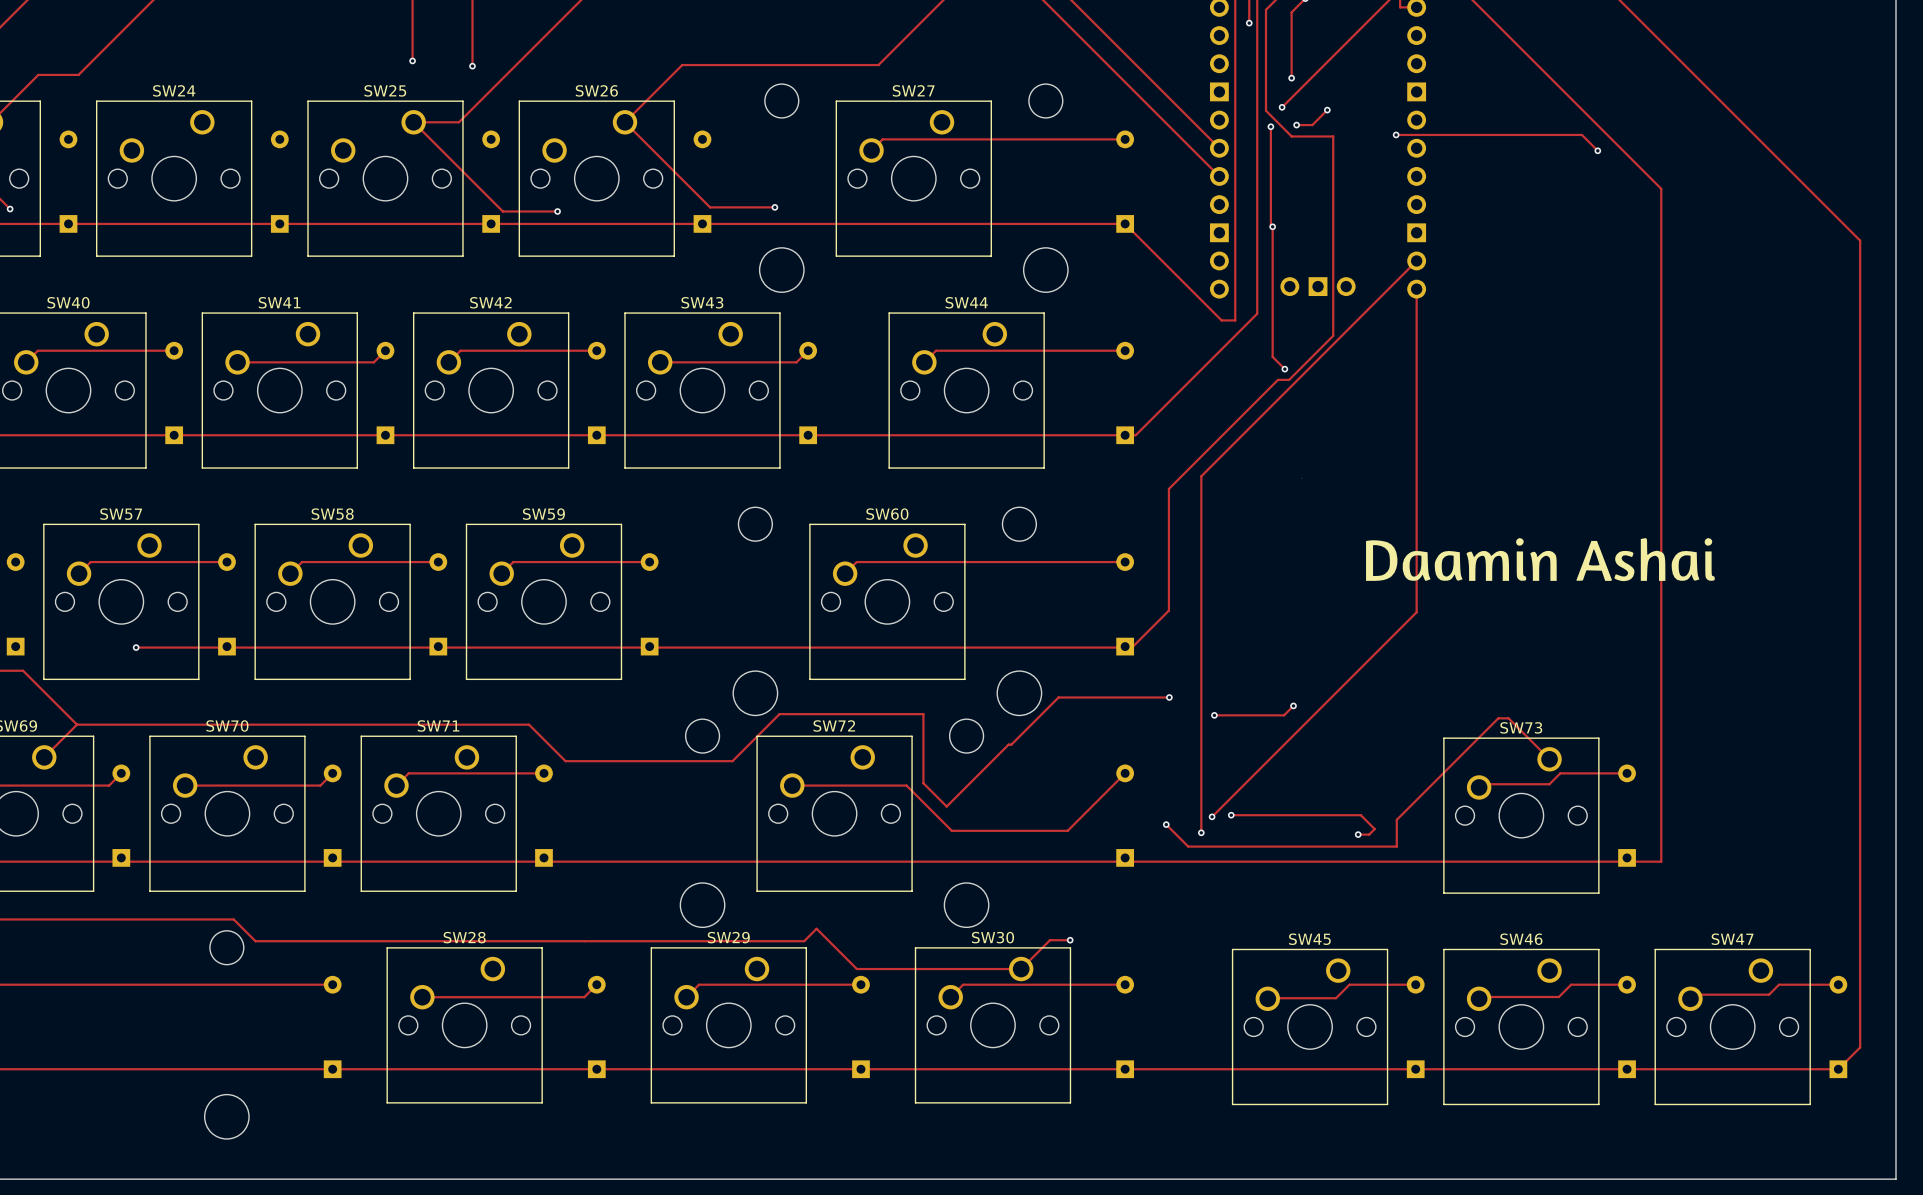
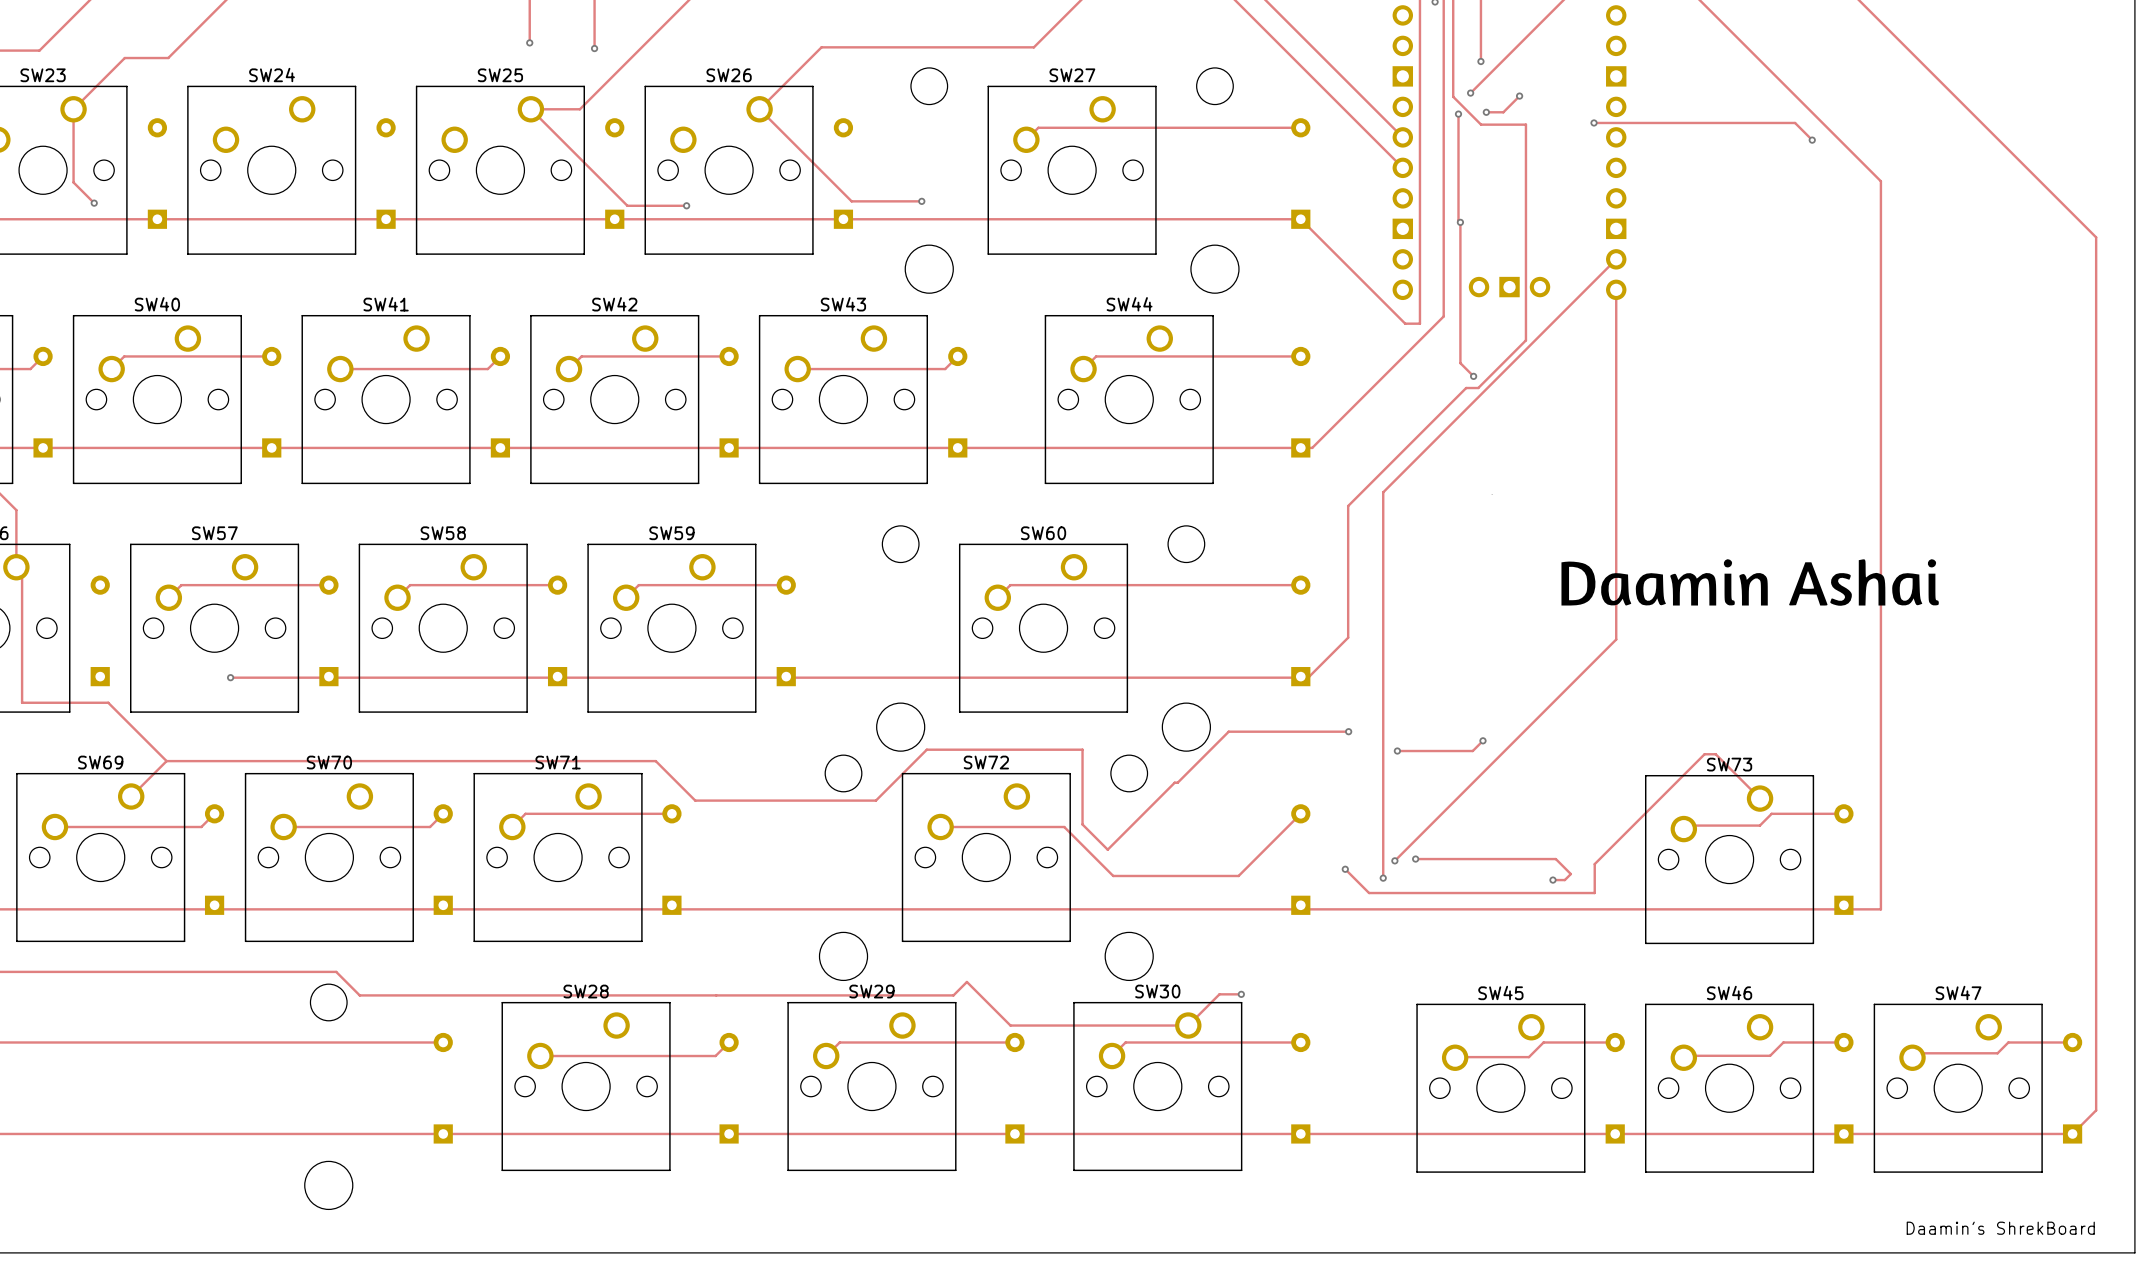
text: none -> Daamin's ShrekBoard (2000, 1228)

